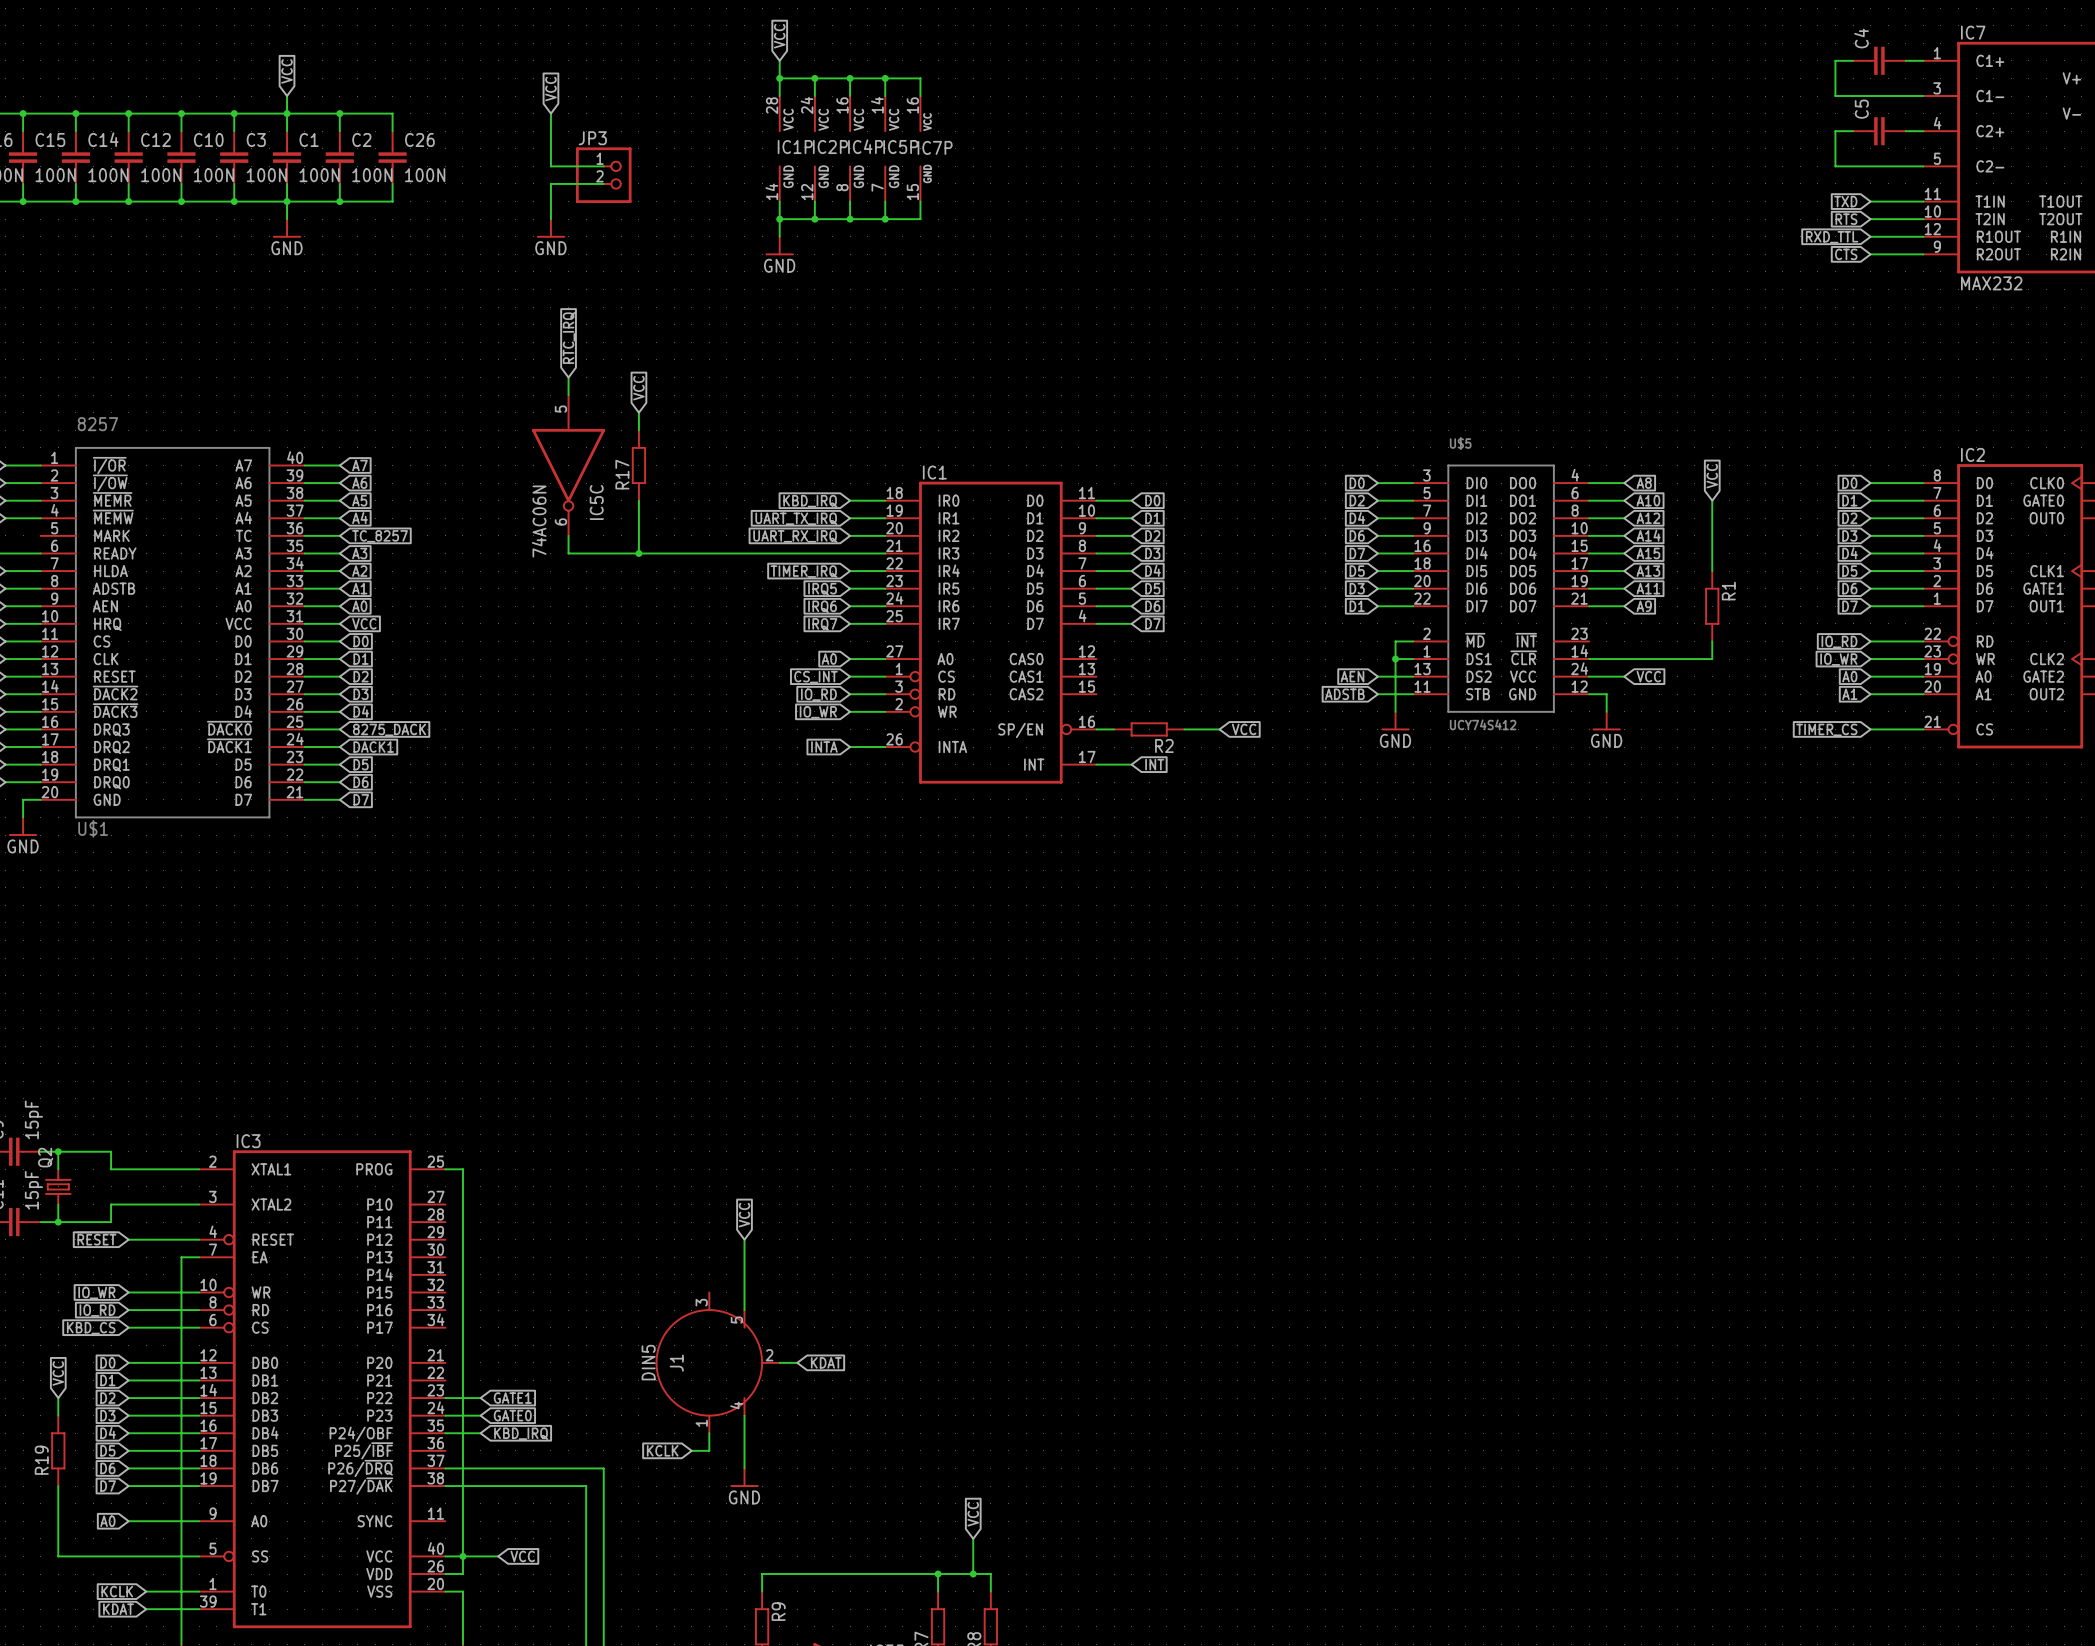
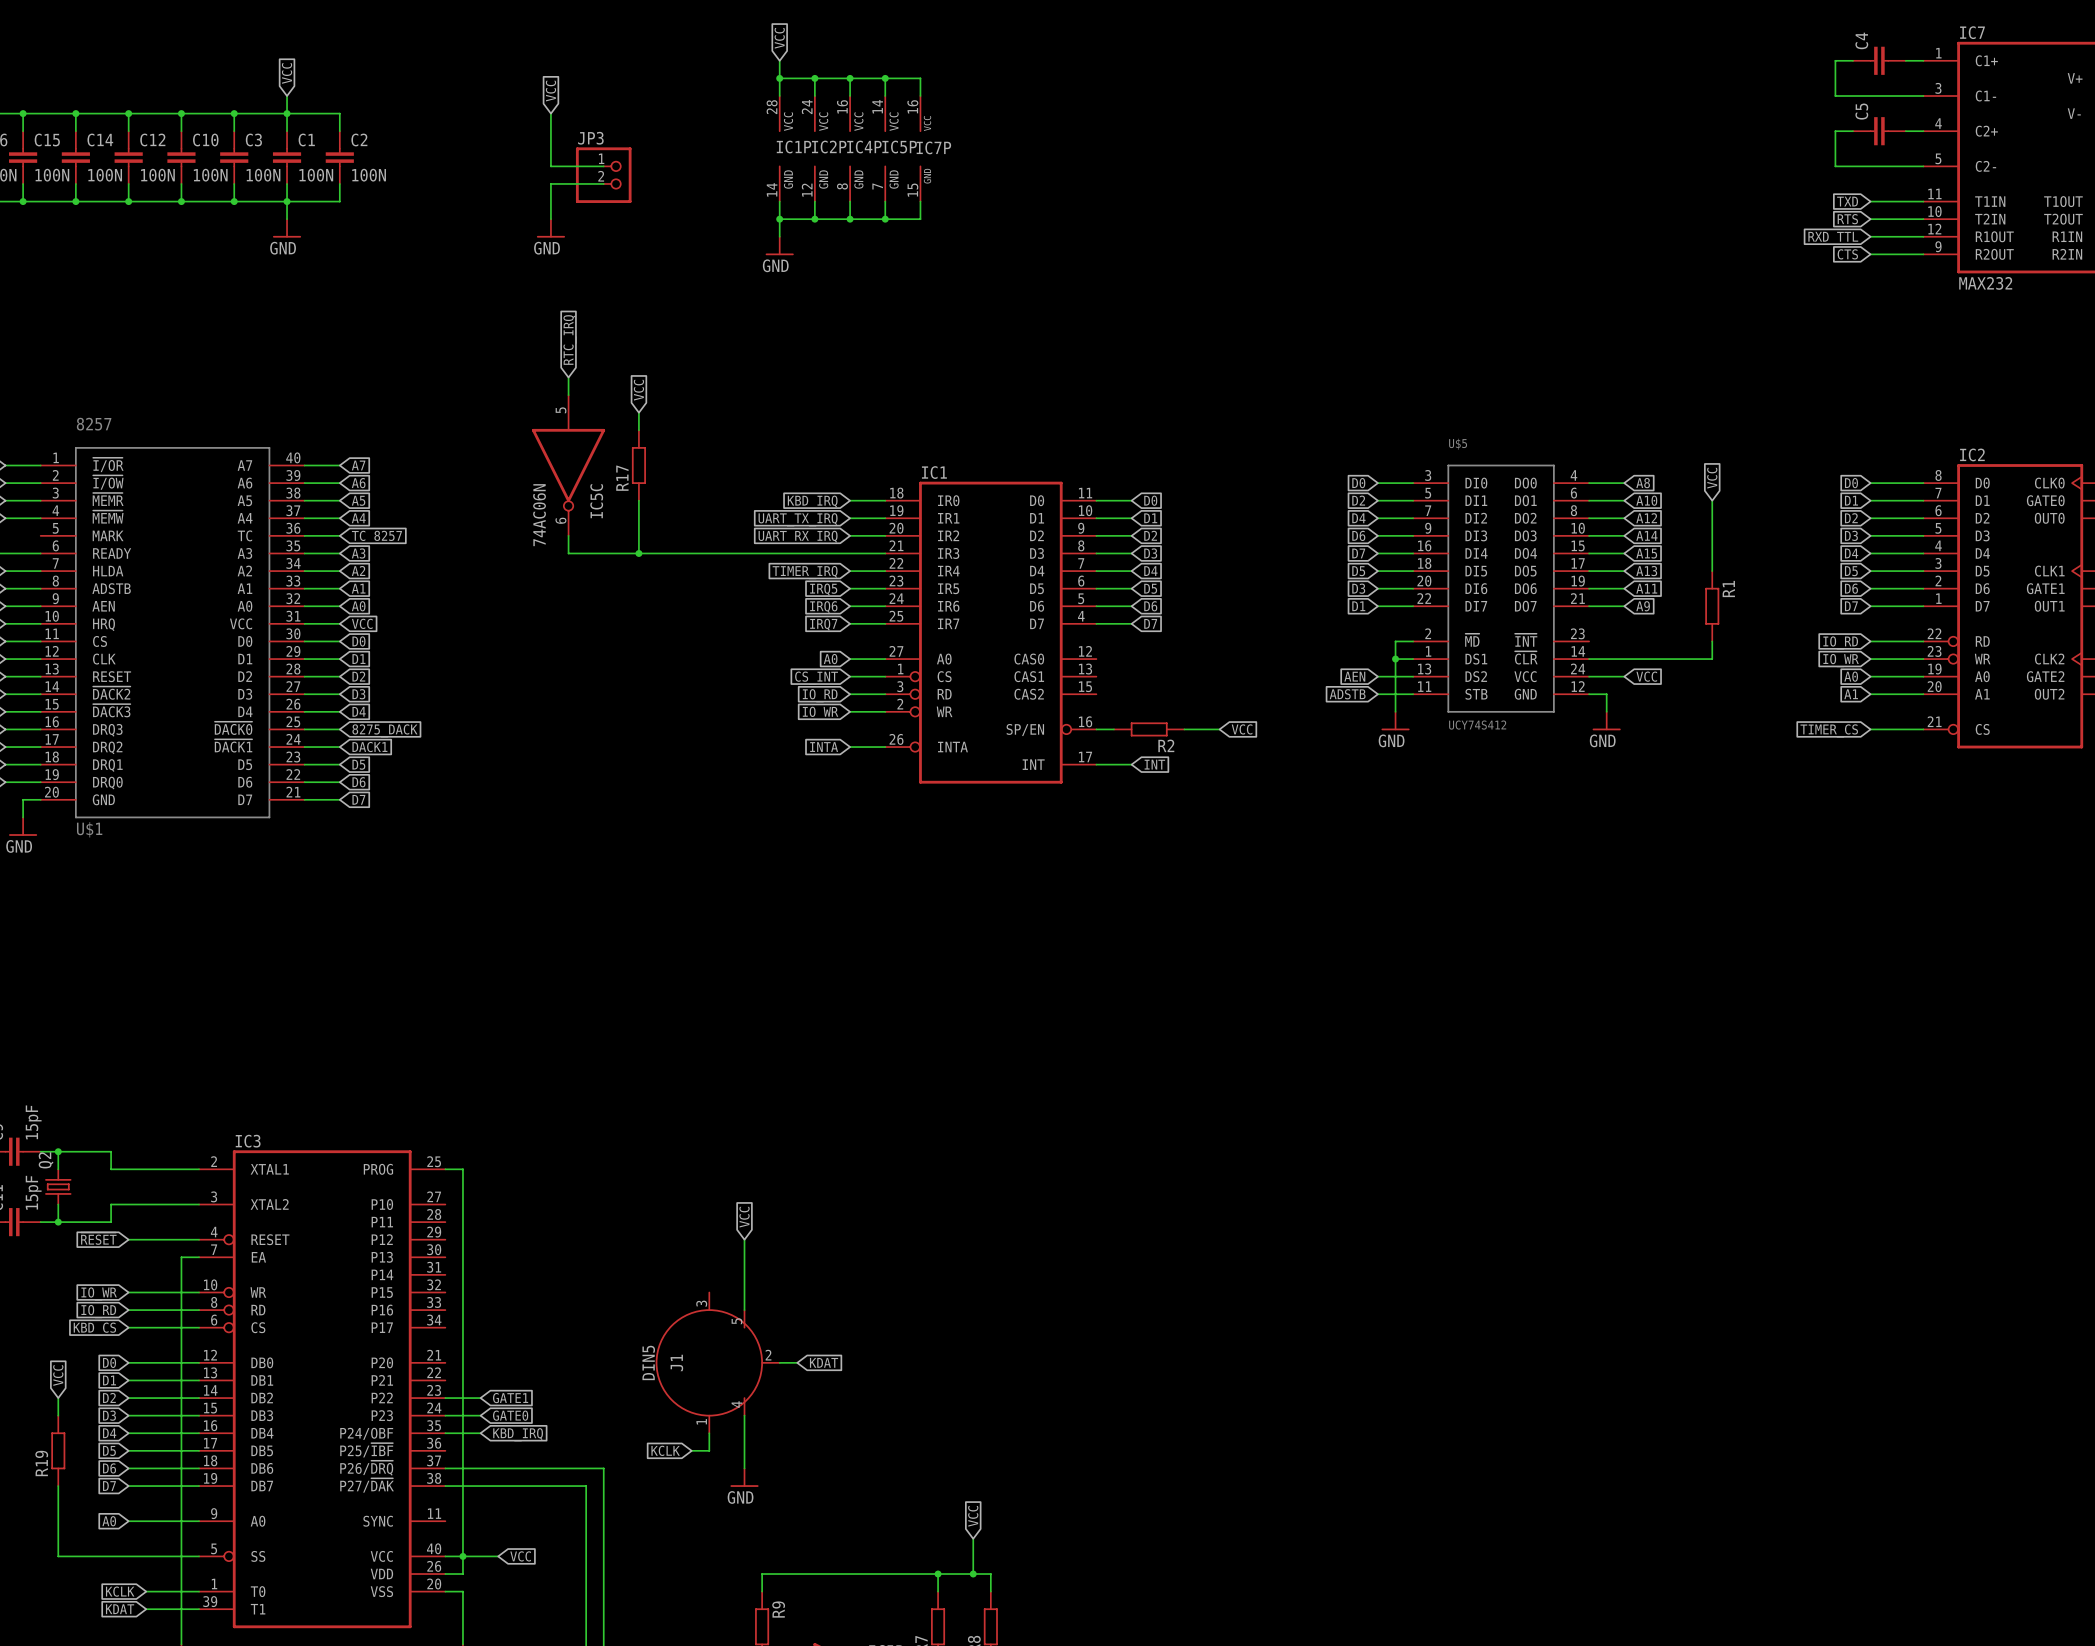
wire: (339, 113) (392, 113) (392, 131) -> none
junction: (339, 113) -> none
C26: 100N (392, 157) -> none
wire: (392, 183) (392, 201) (339, 201) -> none
junction: (339, 201) -> none

